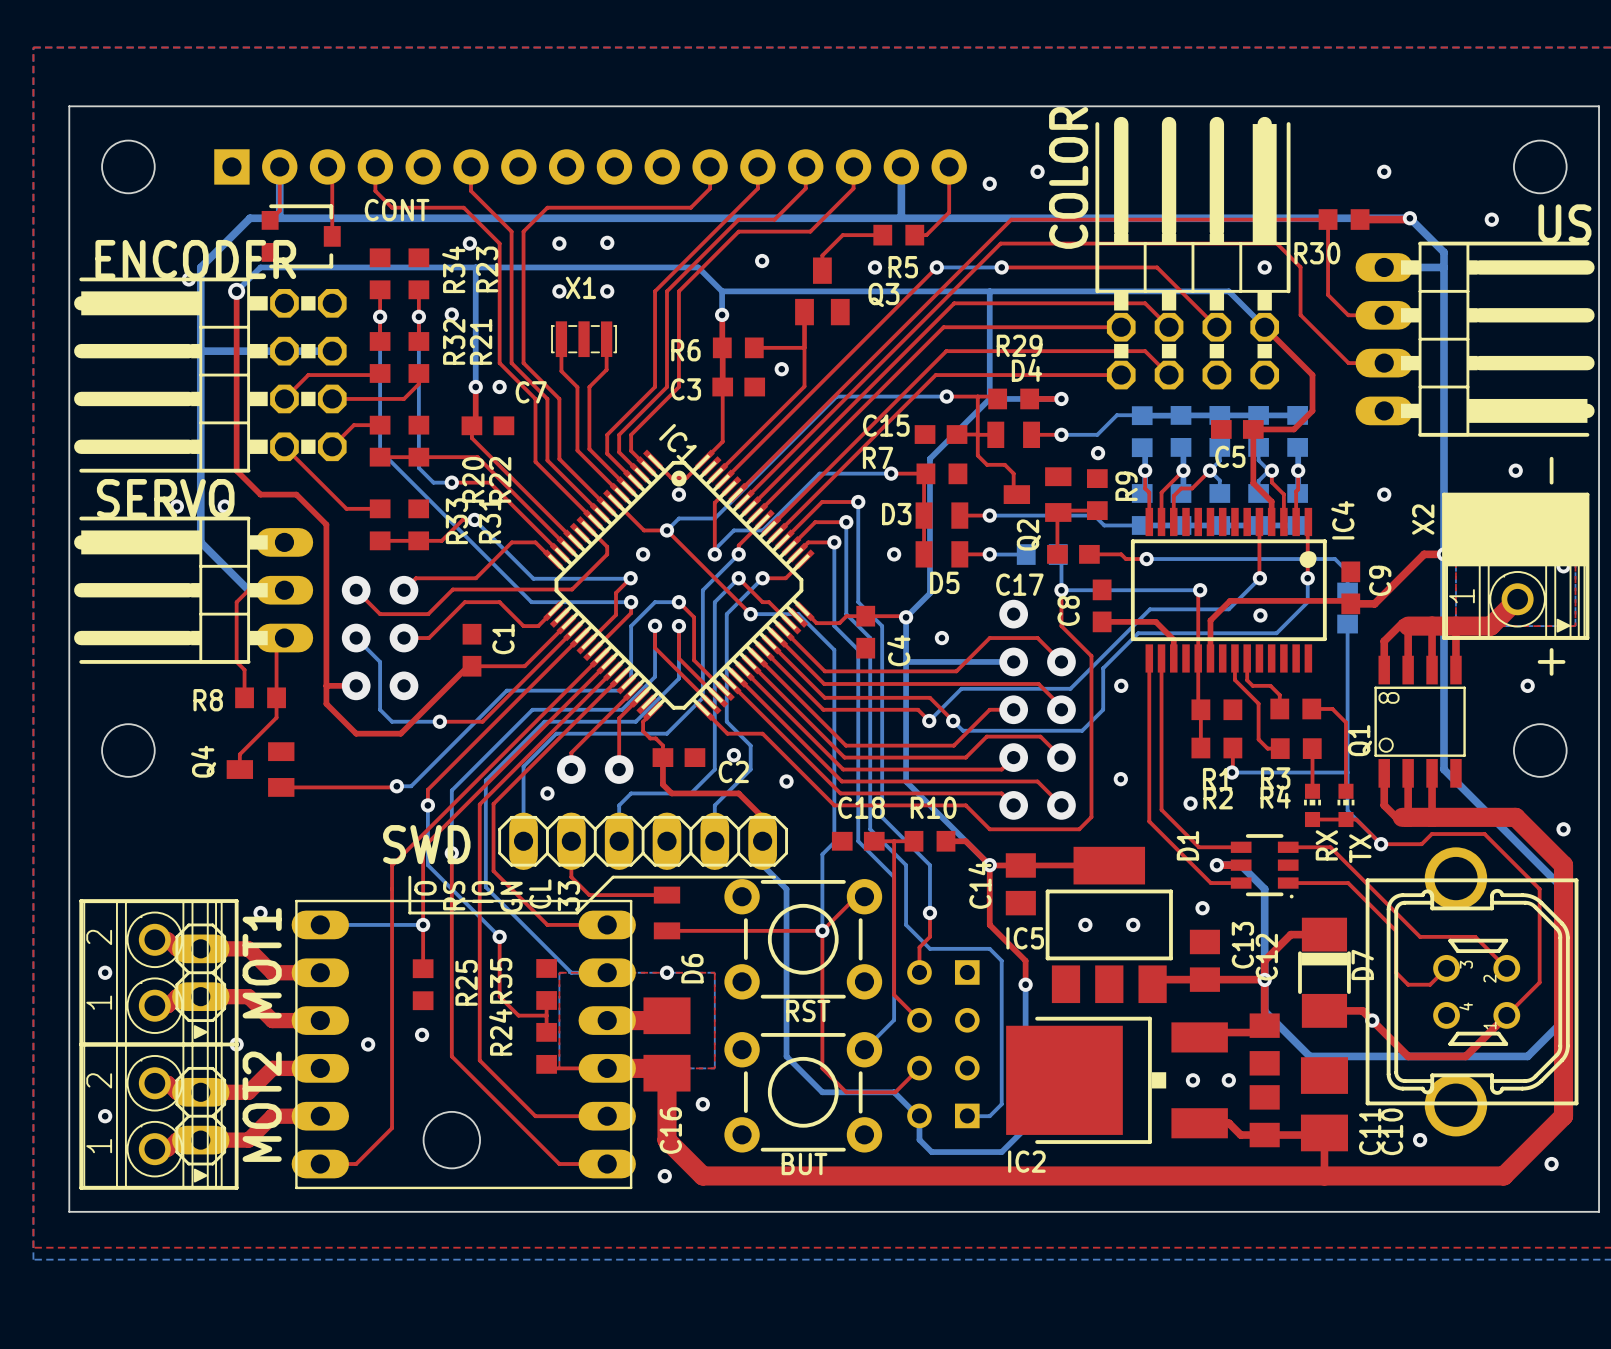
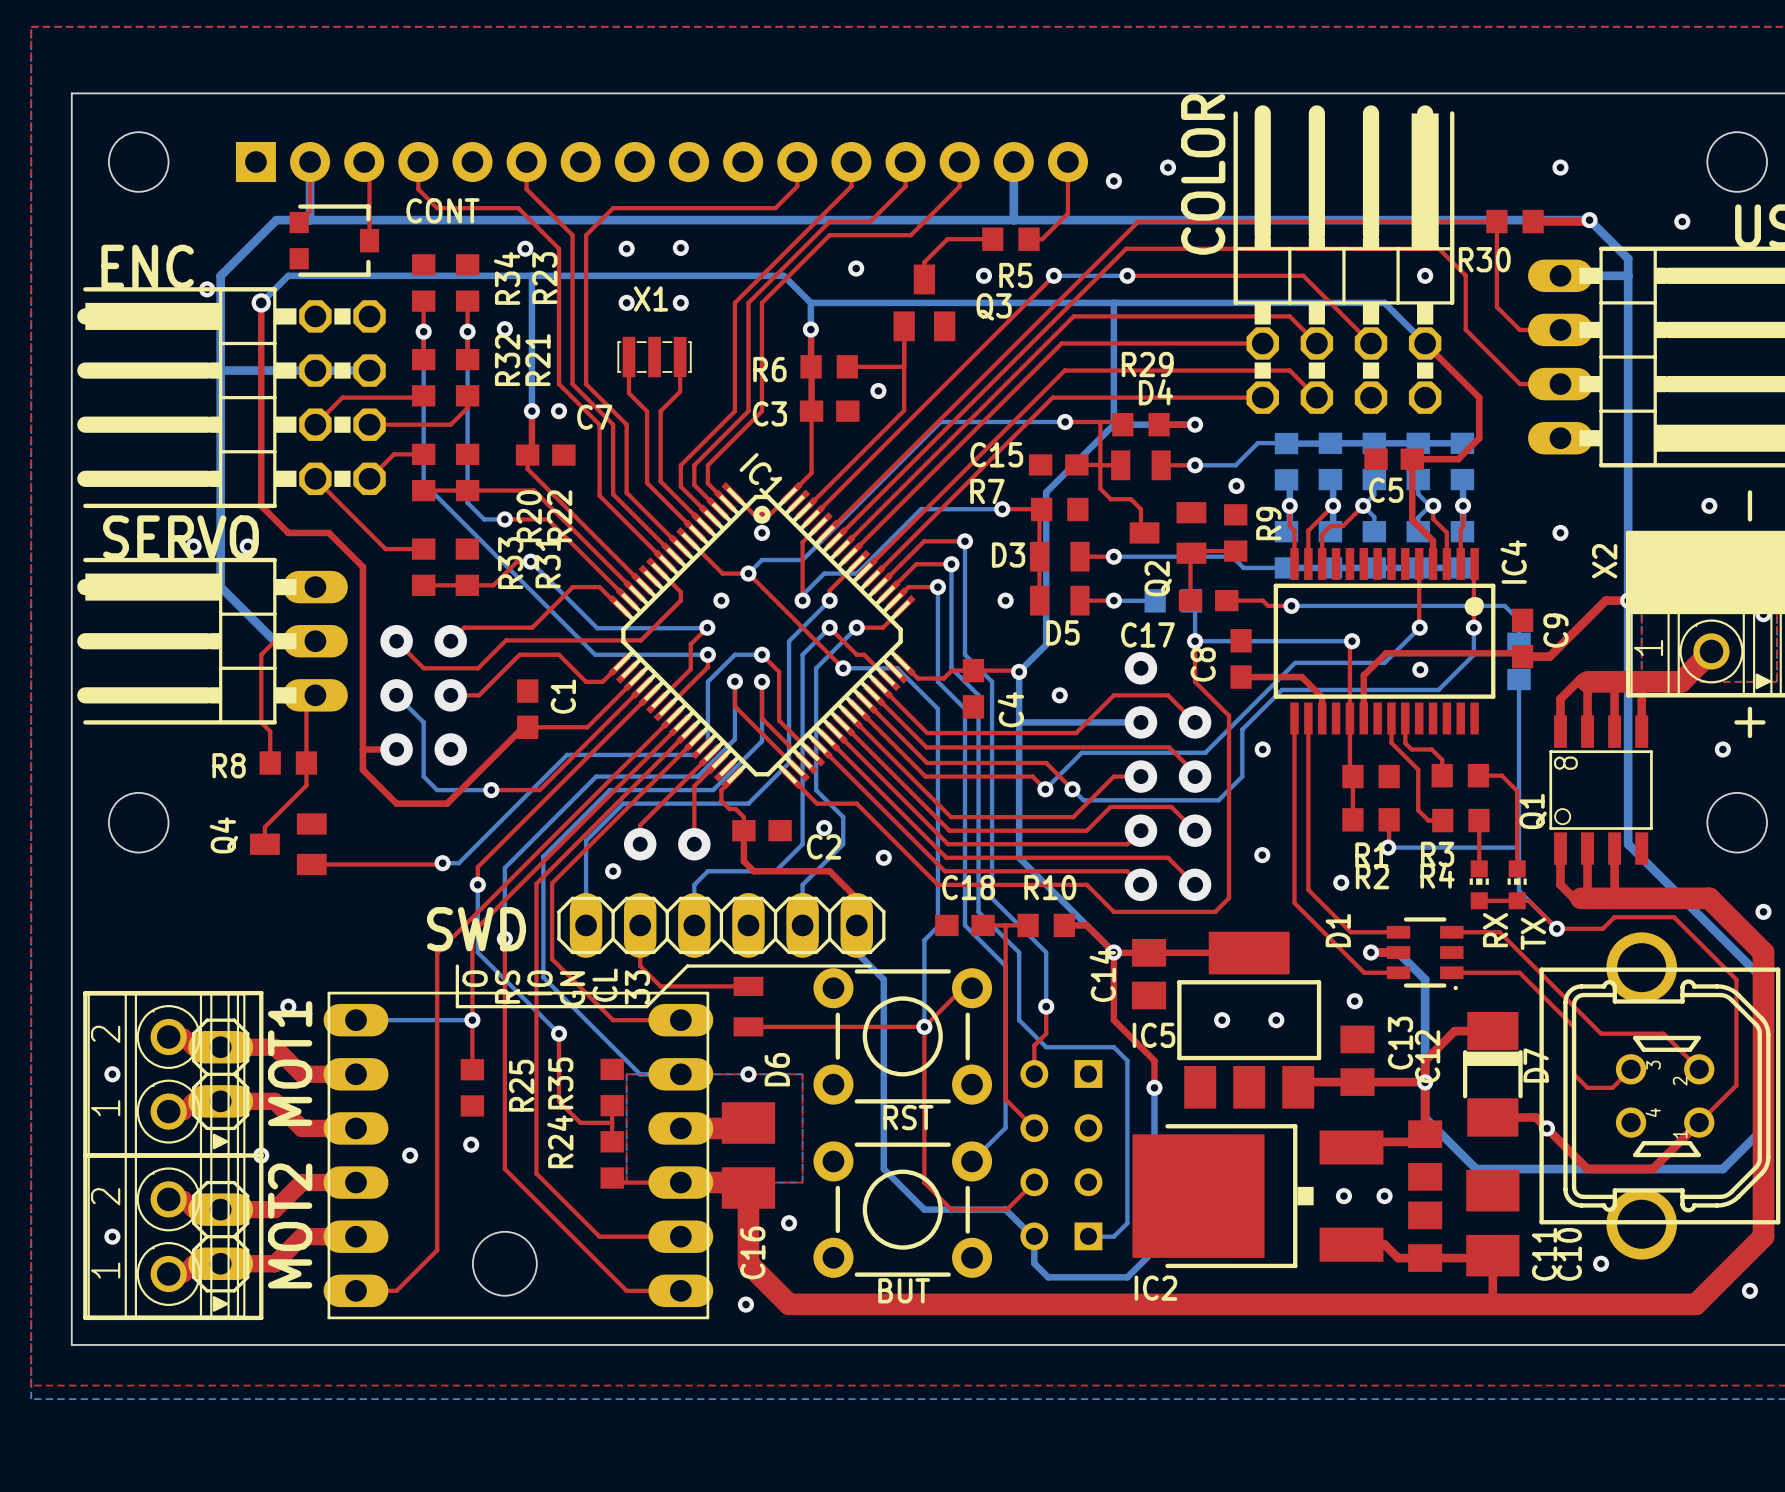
ENCODER name: ENCODER (195, 259) -> ENC (147, 266)

